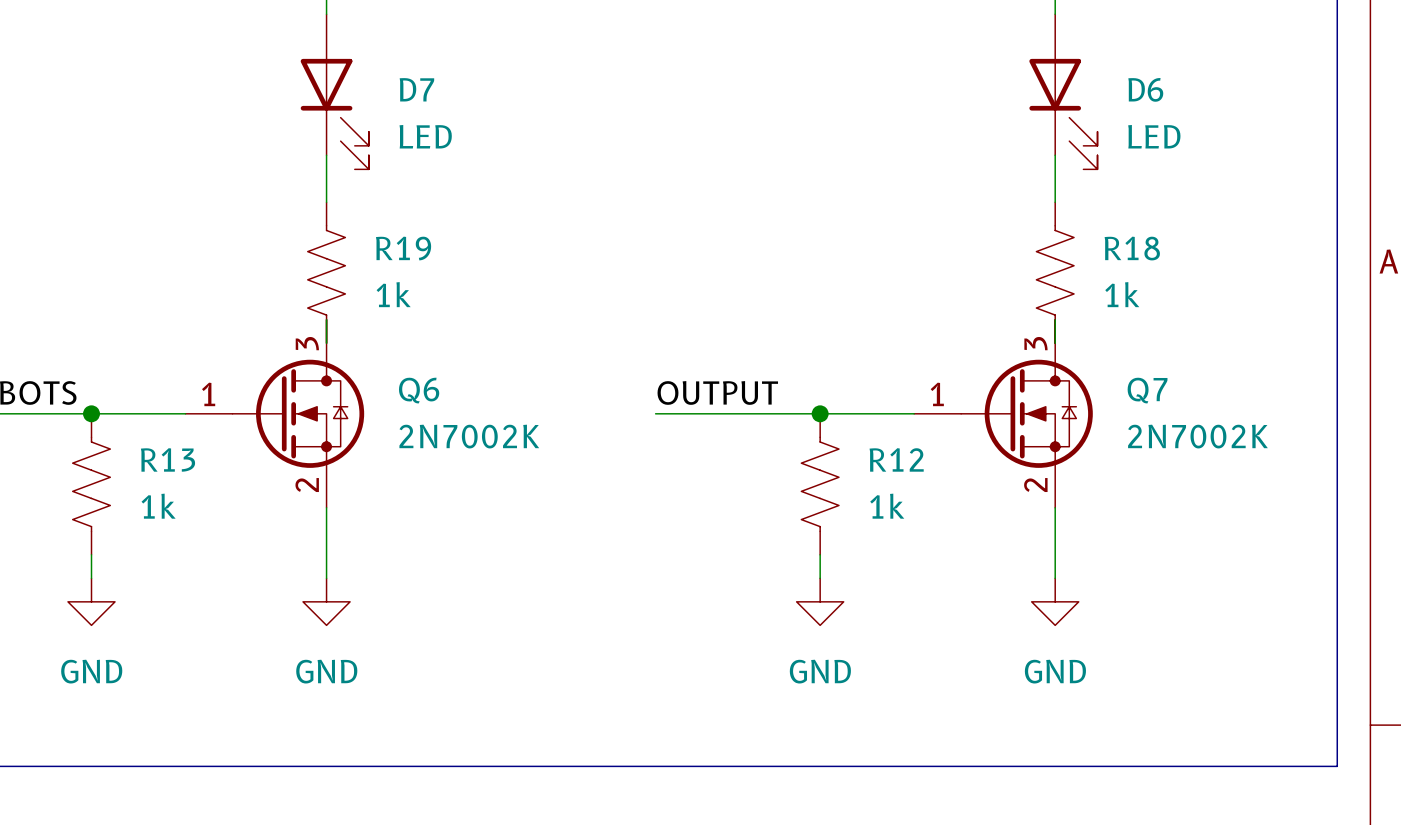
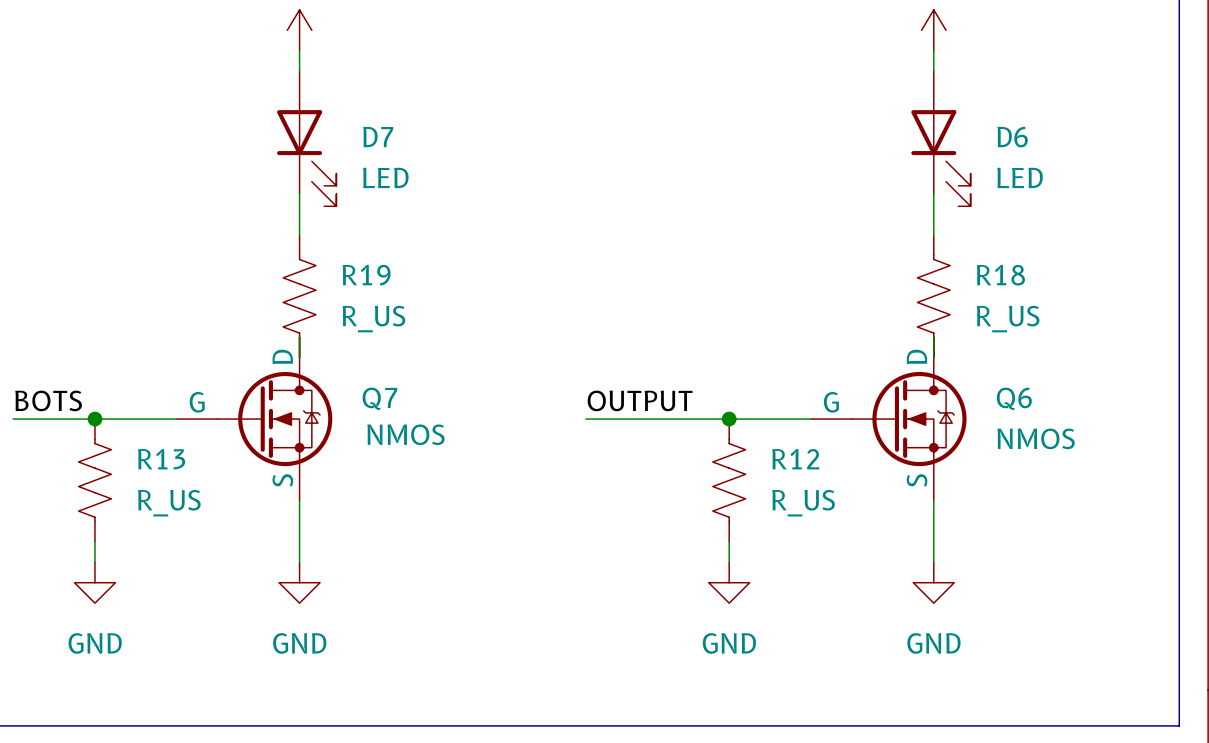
R19 value: 1k (393, 294) -> R_US (373, 319)
R18 value: 1k (1122, 294) -> R_US (1008, 319)
Q6 symbol: [185, 319, 365, 508] -> [811, 337, 967, 501]
Q7 symbol: [914, 319, 1093, 508] -> [176, 337, 333, 501]
Q6 value: 2N7002K (469, 436) -> NMOS (1036, 438)
Q7 value: 2N7002K (1197, 436) -> NMOS (405, 434)
R13 value: 1k (158, 506) -> R_US (169, 503)
R12 value: 1k (887, 506) -> R_US (803, 503)

